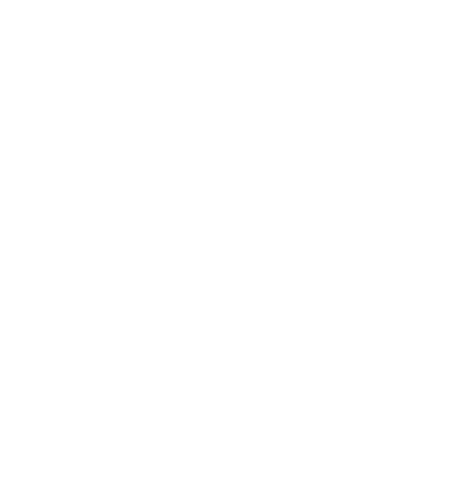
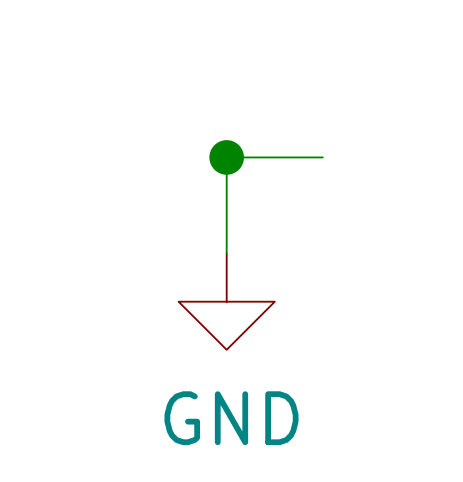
junction: none -> (226, 157)
wire: none -> (322, 157) (226, 157) (226, 253)
power symbol: none -> GND (226, 301)

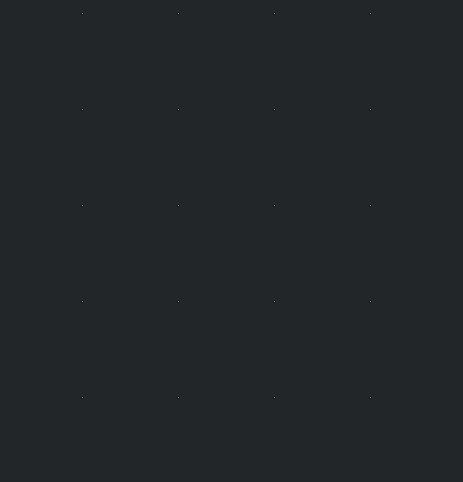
junction: (226, 157) -> none
wire: (322, 157) (226, 157) (226, 253) -> none
power symbol: GND (226, 301) -> none

